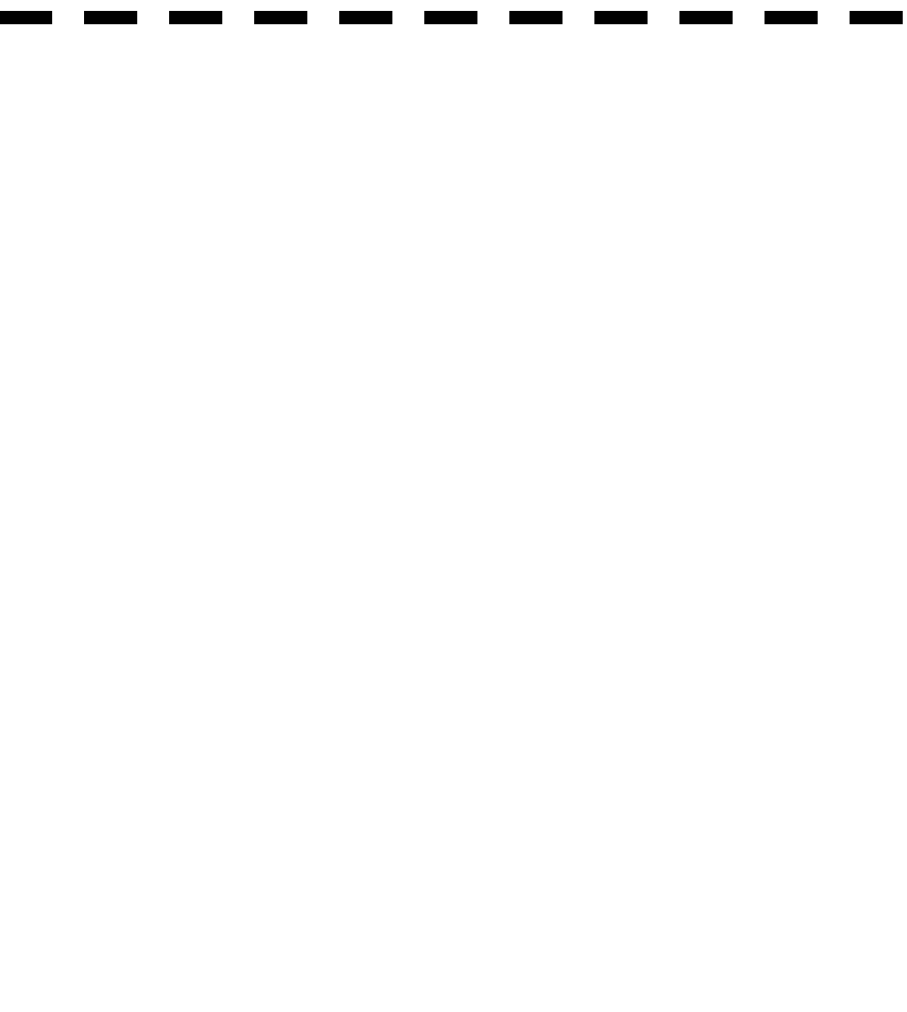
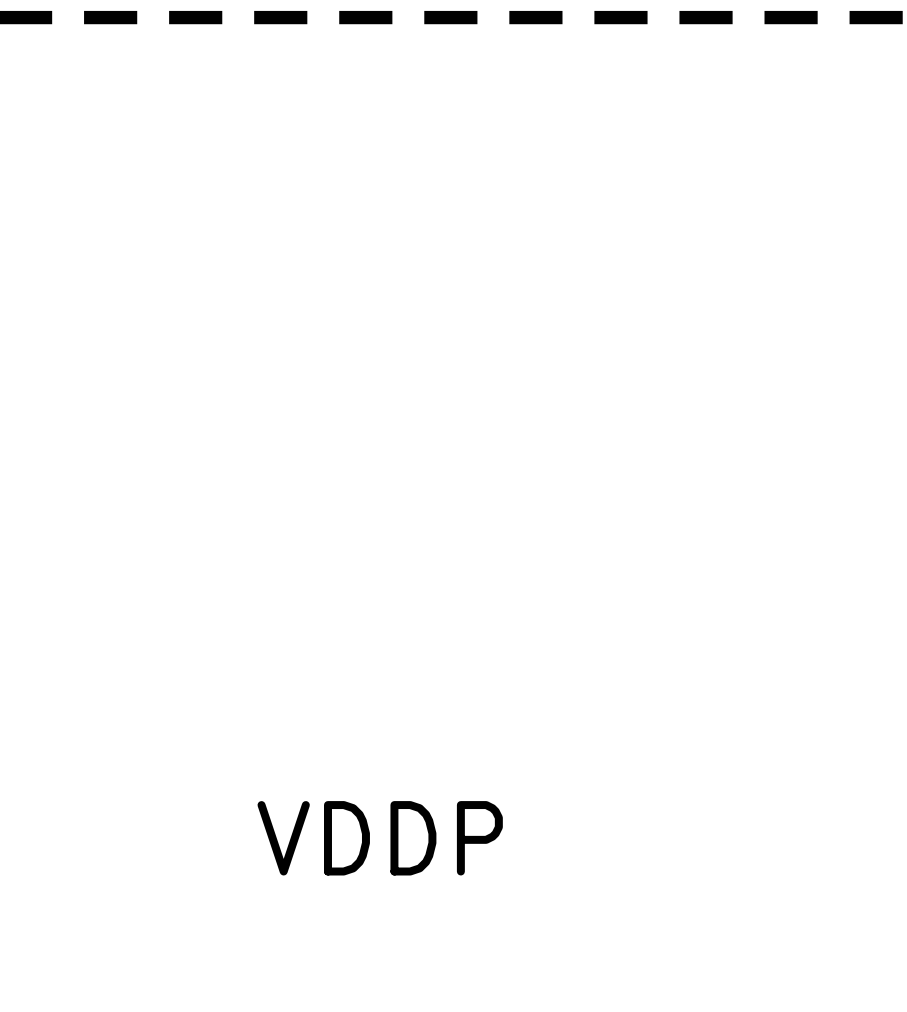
text: none -> VDDP (380, 838)

